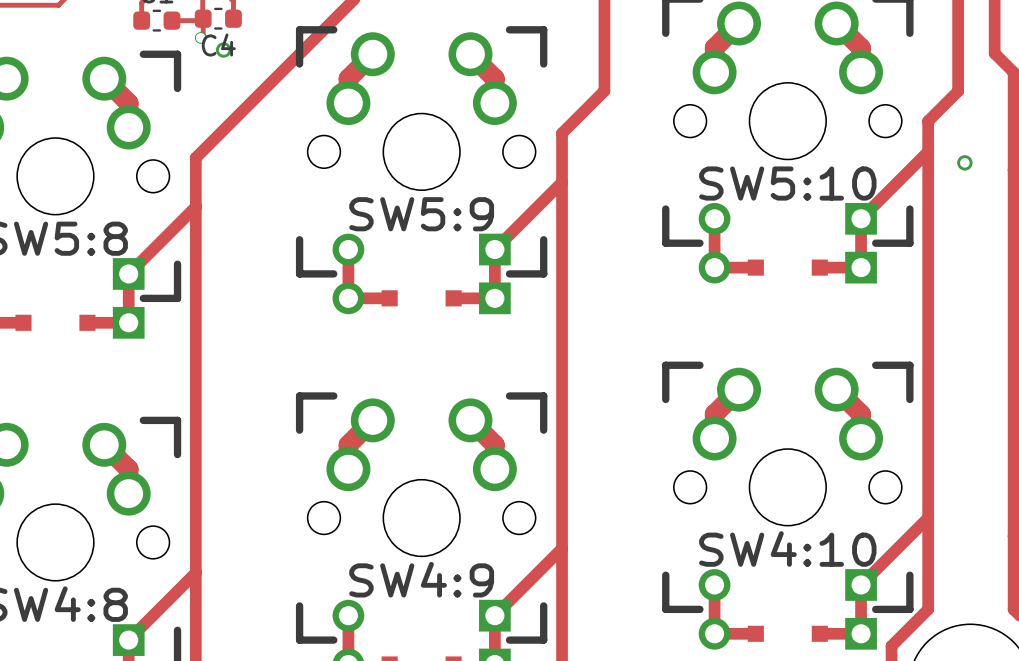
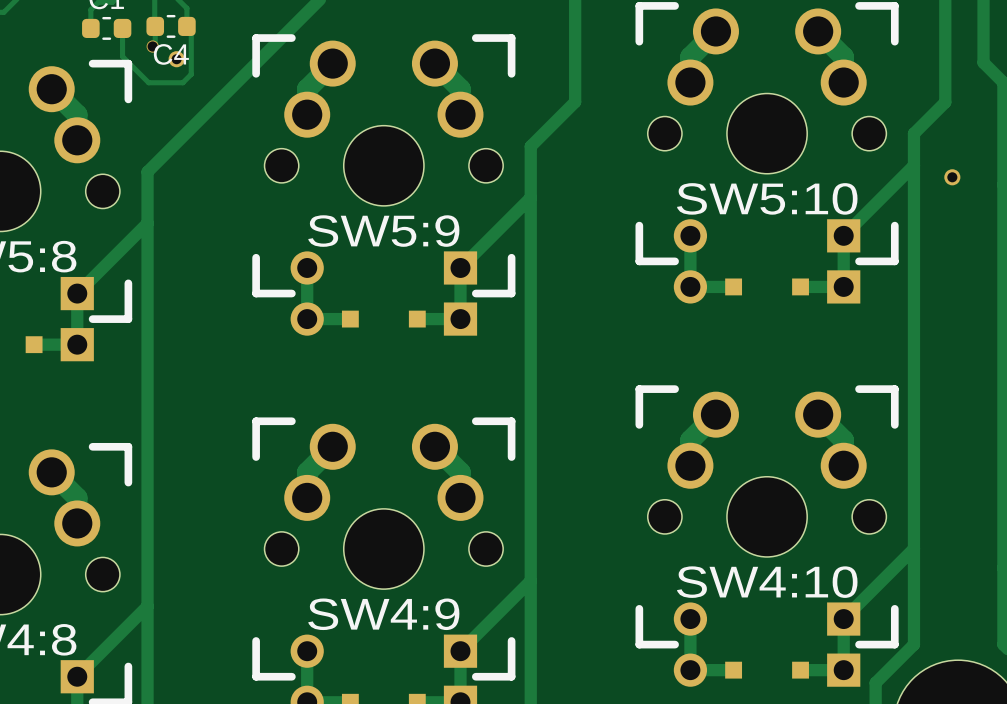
track: (203, 18) (201, 20) (171, 20) -> (186, 26) (191, 30) (191, 74) (182, 82) (148, 82) (122, 56) (122, 28)

